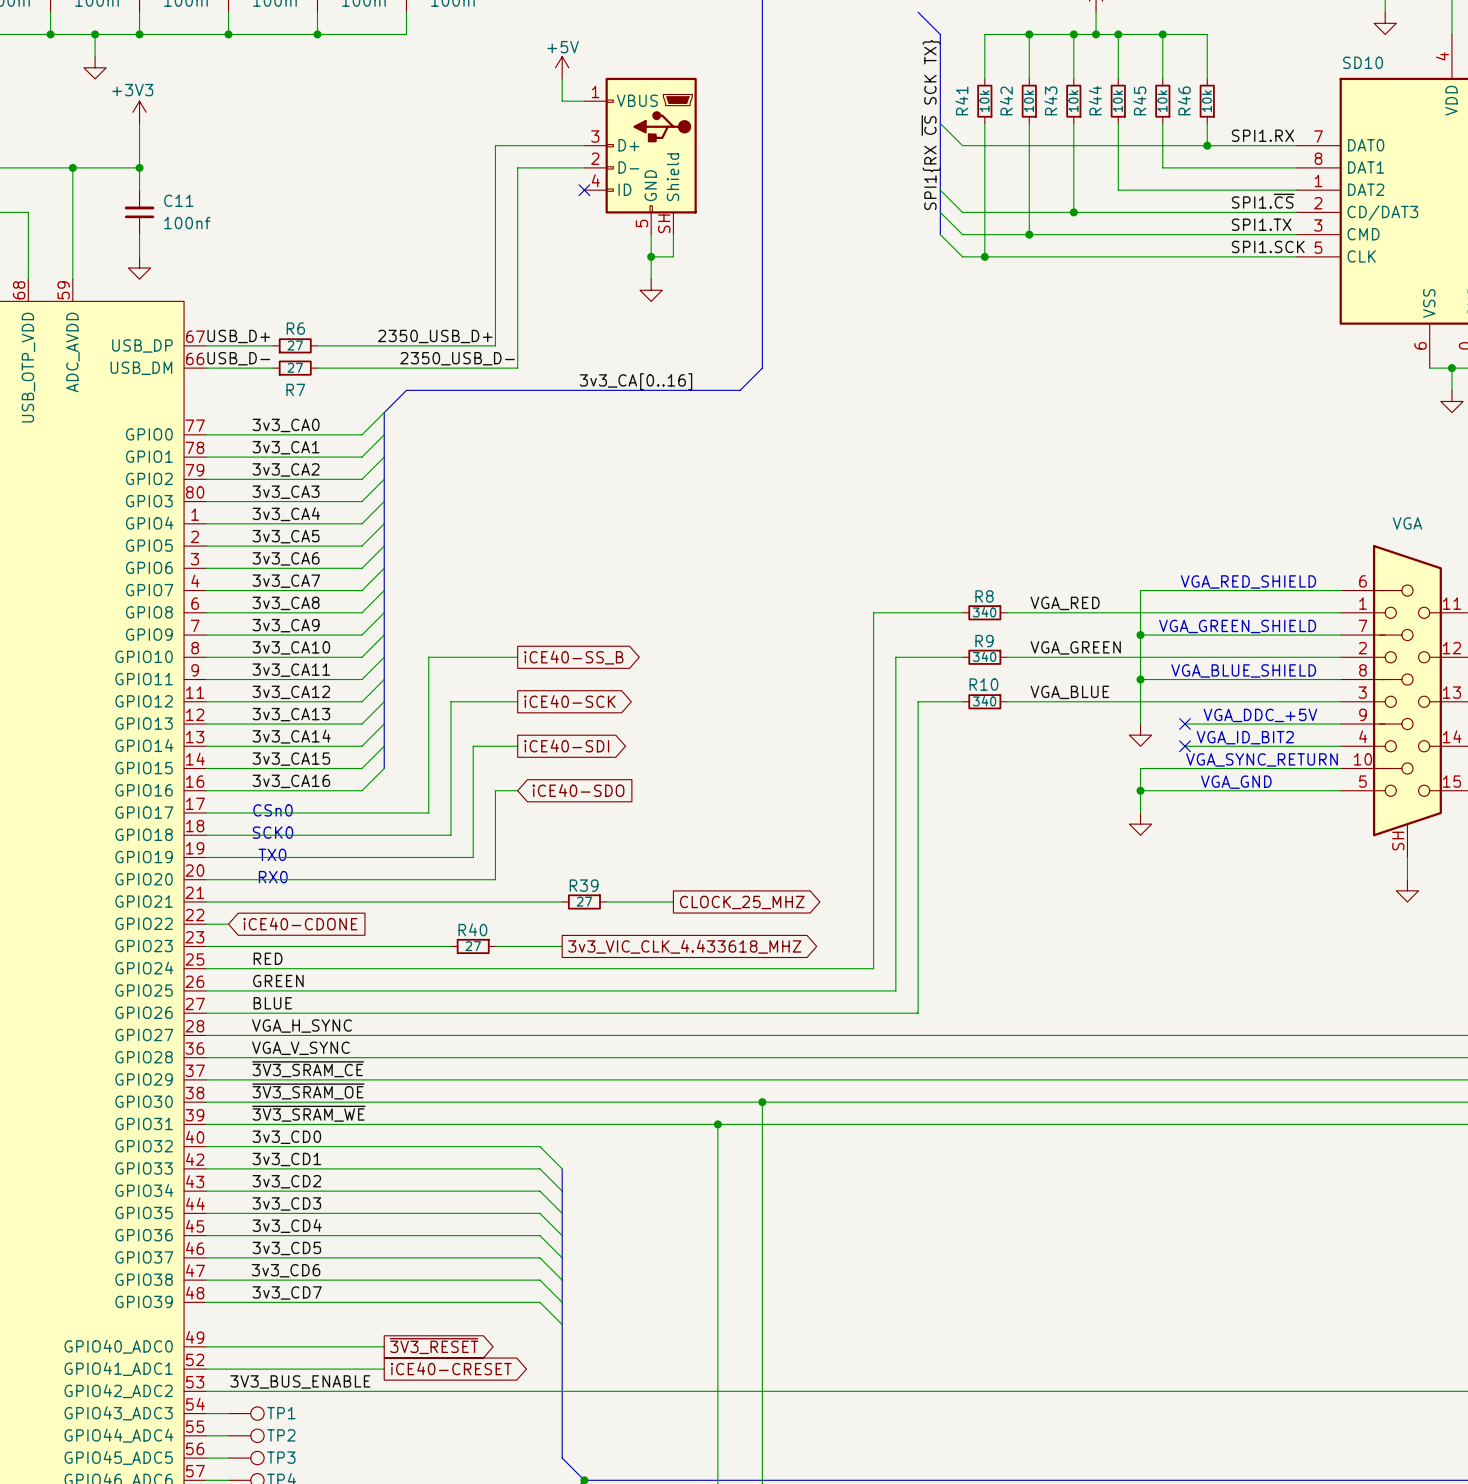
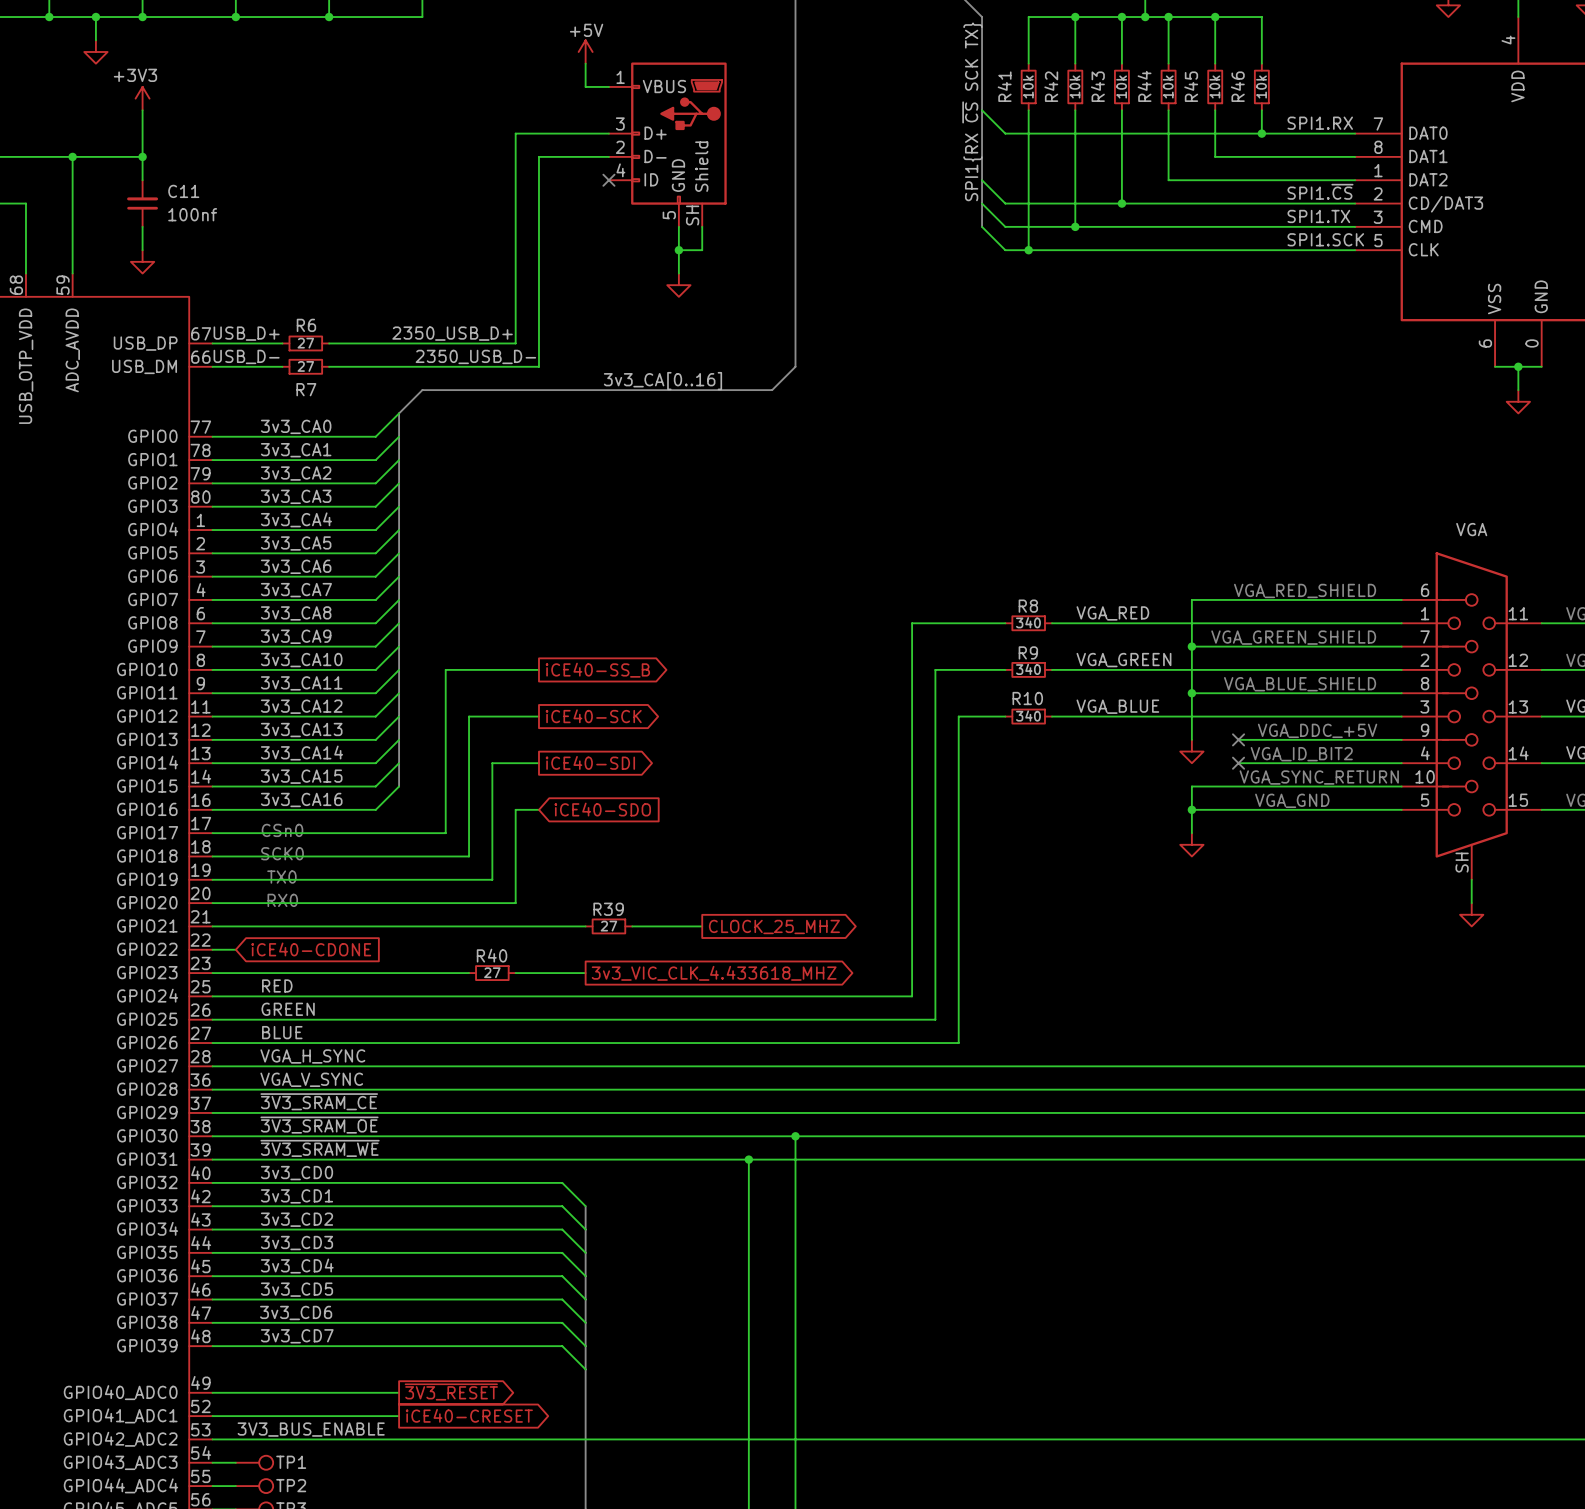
SD10 name: SD10 (1363, 62) -> none

